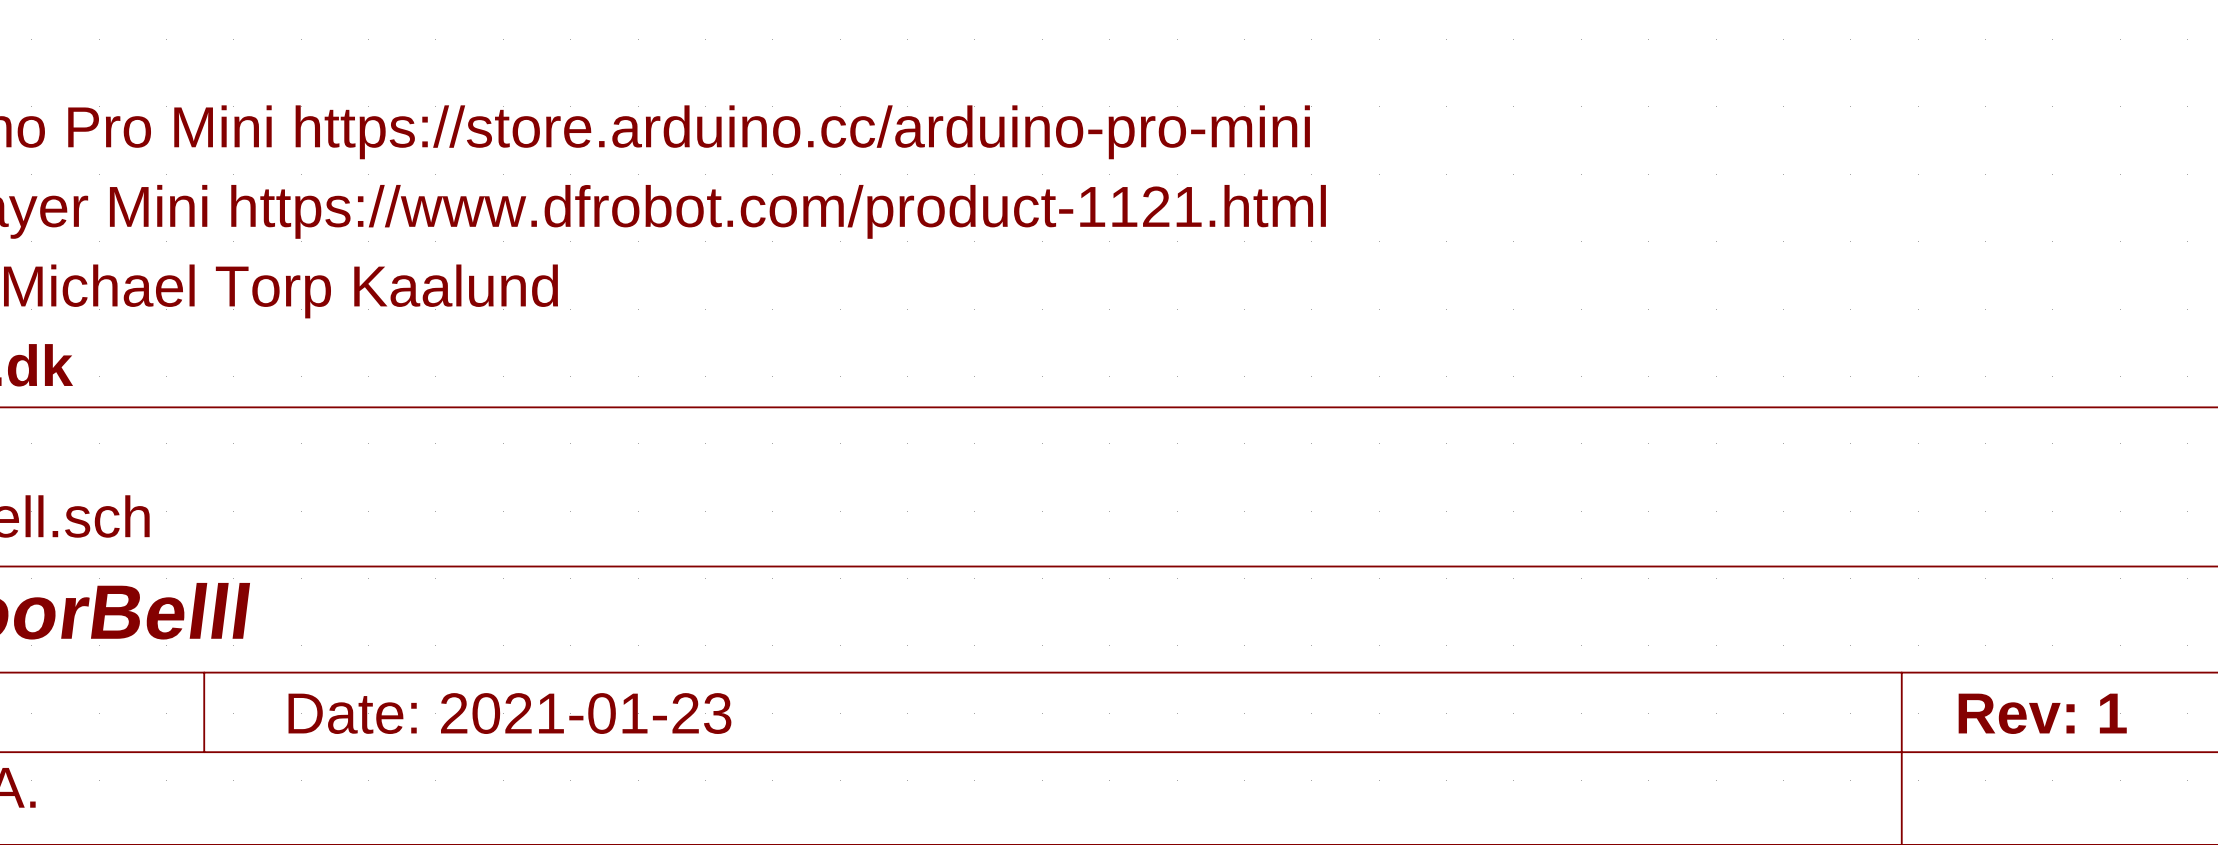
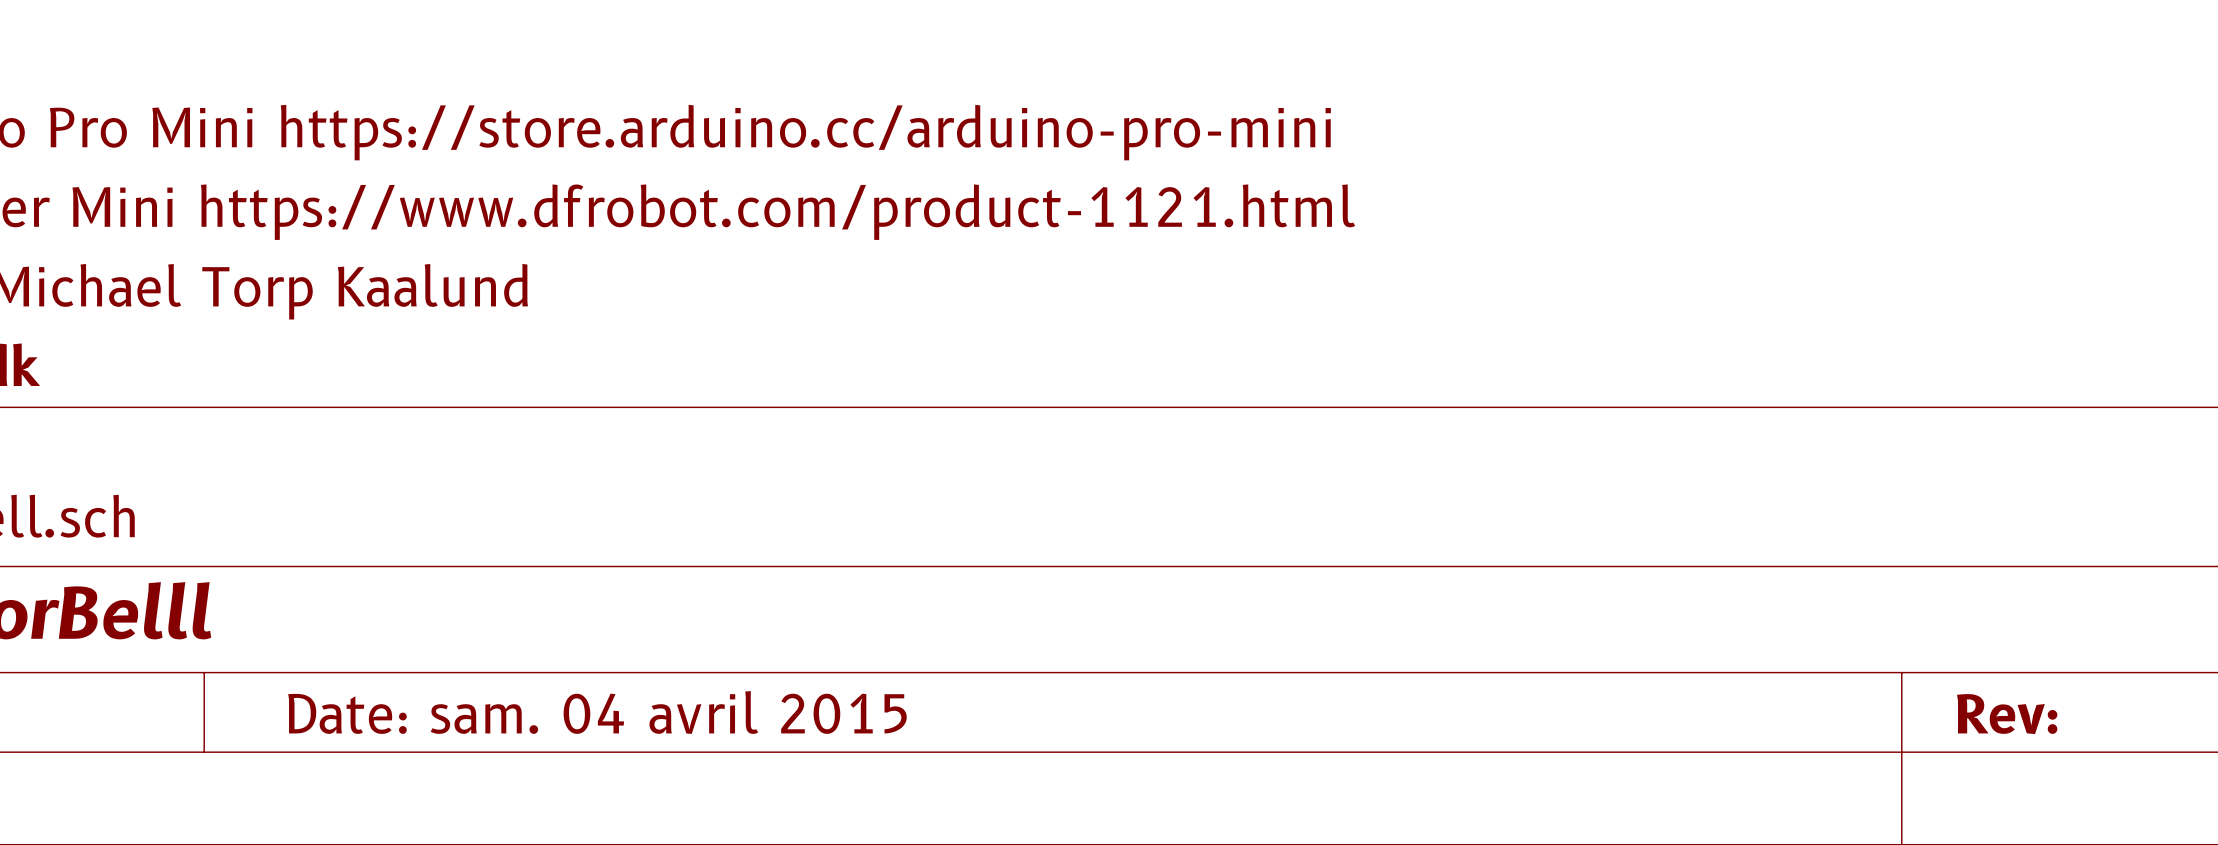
title block: Date: 2021-01-23 (509, 713) -> Date: sam. 04 avril 2015 (597, 712)
title block: Rev: 1 (2042, 713) -> Rev: (2007, 714)

